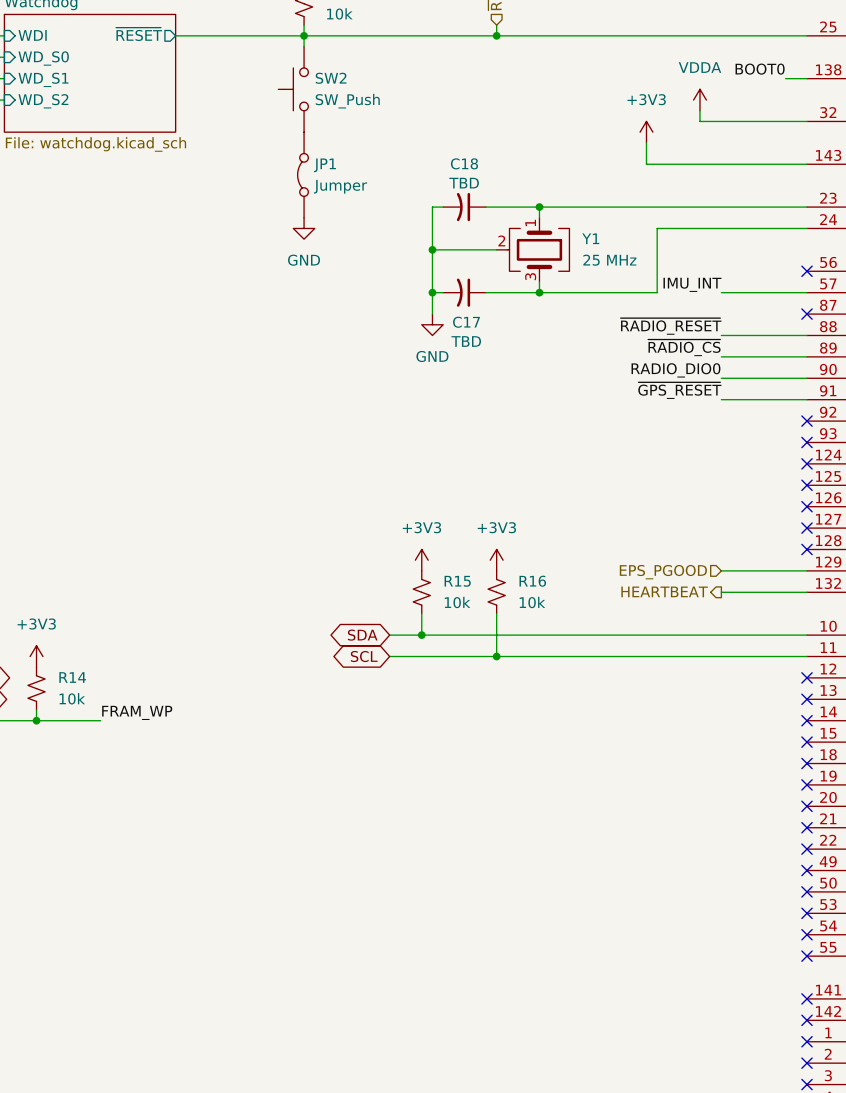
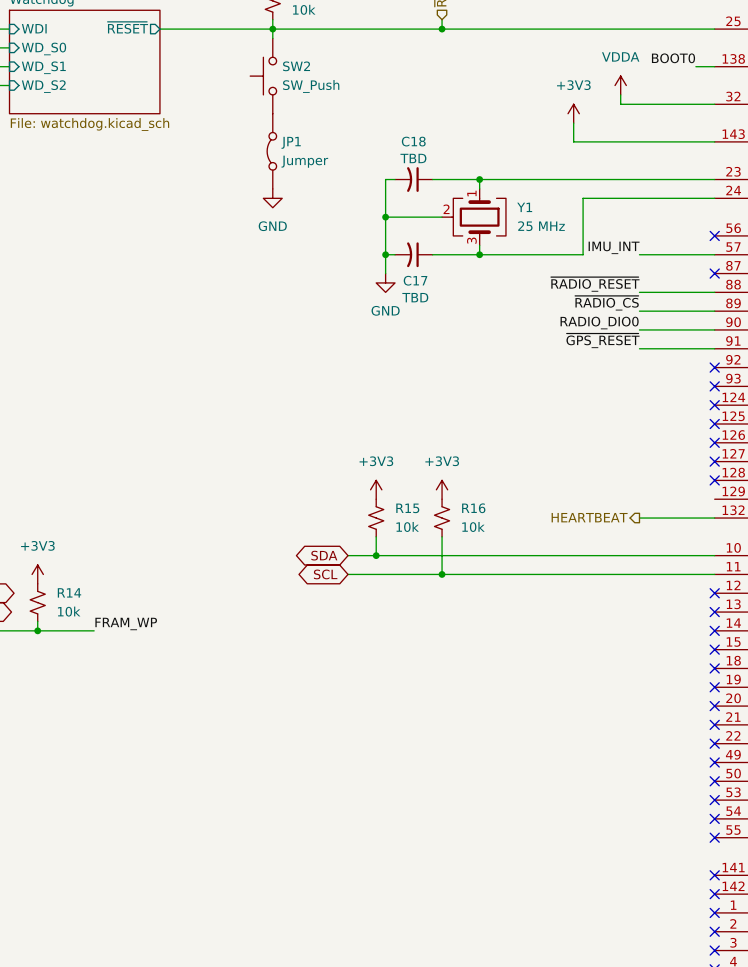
wire: (721, 570) (806, 570) -> none
hierarchical label: EPS_PGOOD (663, 572) -> none

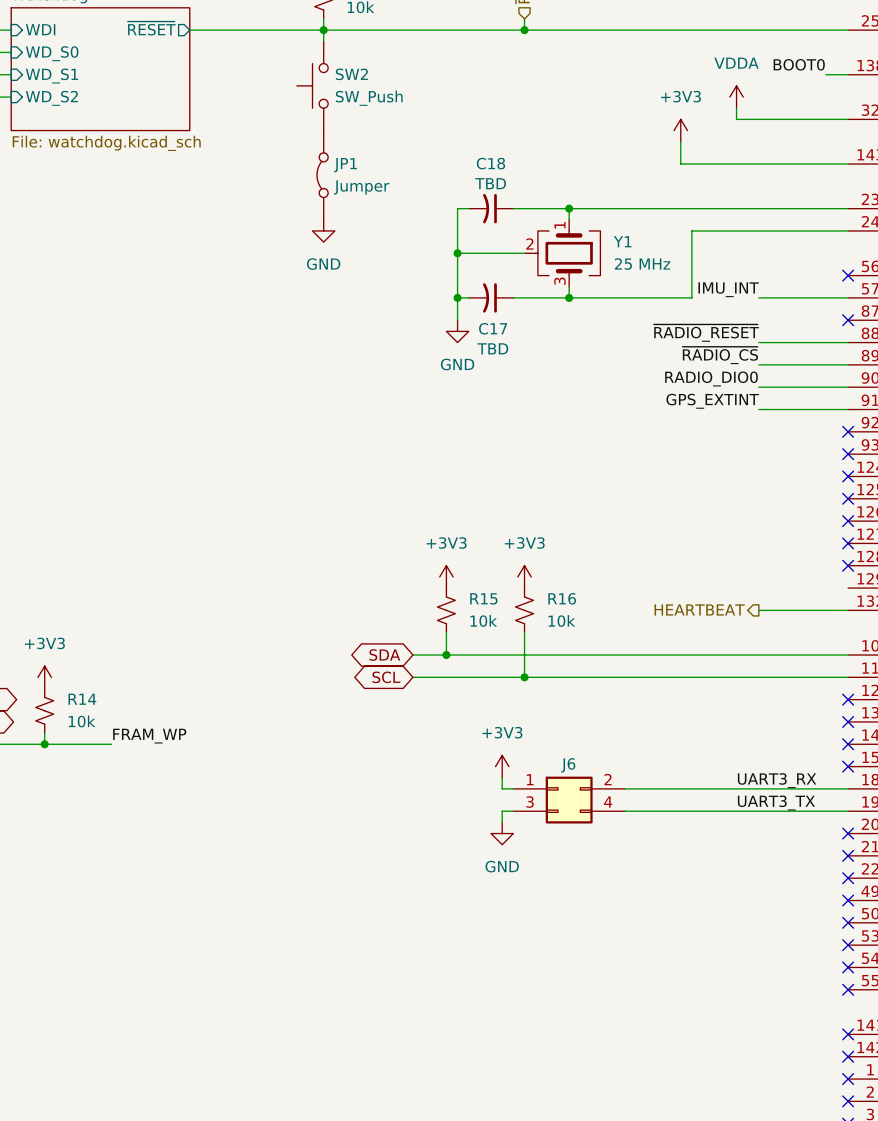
label: ~{GPS_RESET} (603, 340) -> GPS_EXTINT (712, 401)
power symbol: none -> +3V3 (502, 766)
wire: none -> (502, 777) (502, 788) (513, 788)
label: none -> UART3_RX (777, 780)
wire: none -> (624, 788) (848, 788)
no-connect mark: (714, 668) -> none
J6: none -> (569, 800)
label: none -> UART3_TX (776, 802)
wire: none -> (513, 811) (502, 811) (502, 822)
wire: none -> (624, 811) (848, 811)
no-connect mark: (714, 687) -> none
power symbol: none -> GND (502, 833)

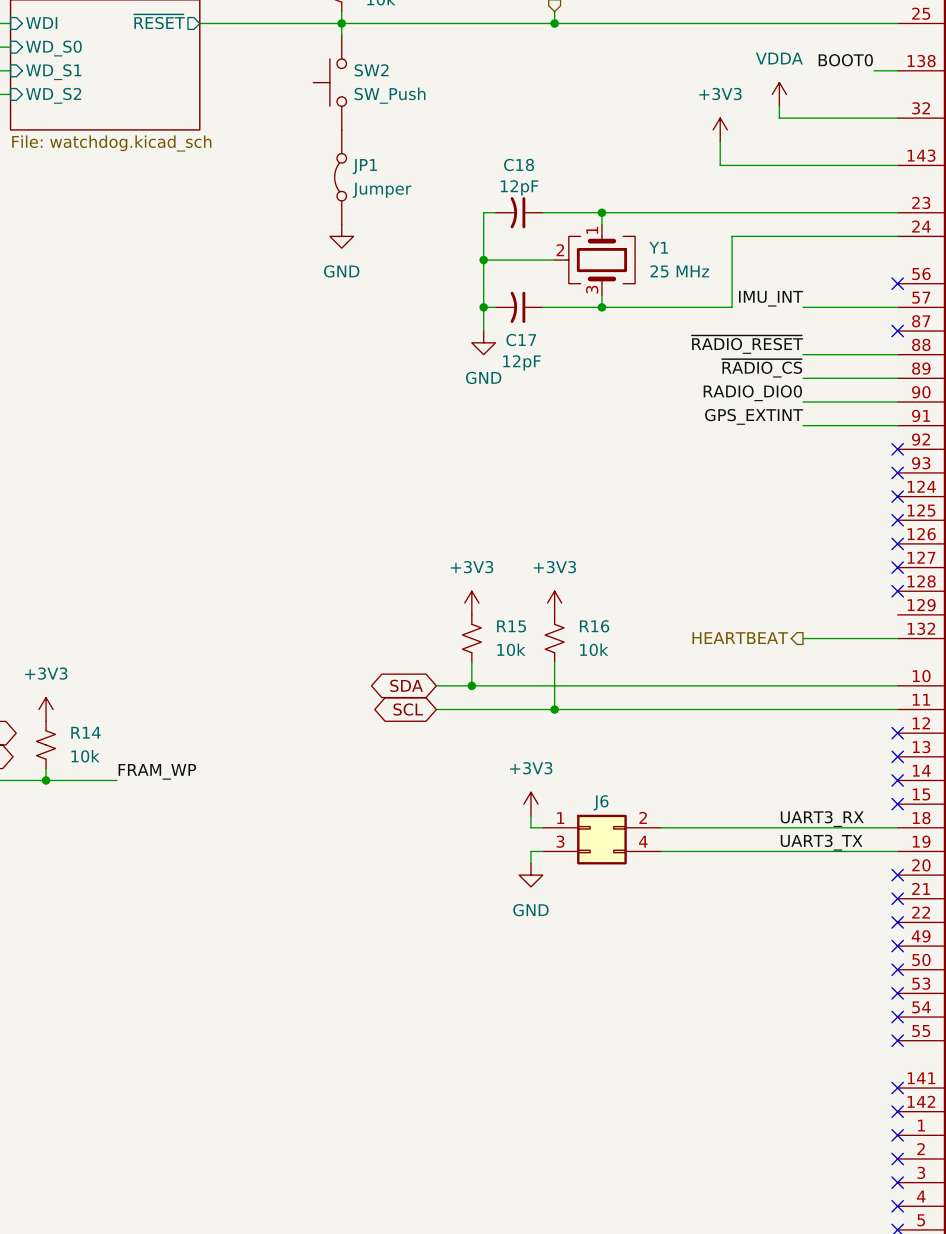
C18 value: TBD (490, 183) -> 12pF (519, 187)
C17 value: TBD (492, 348) -> 12pF (521, 362)

